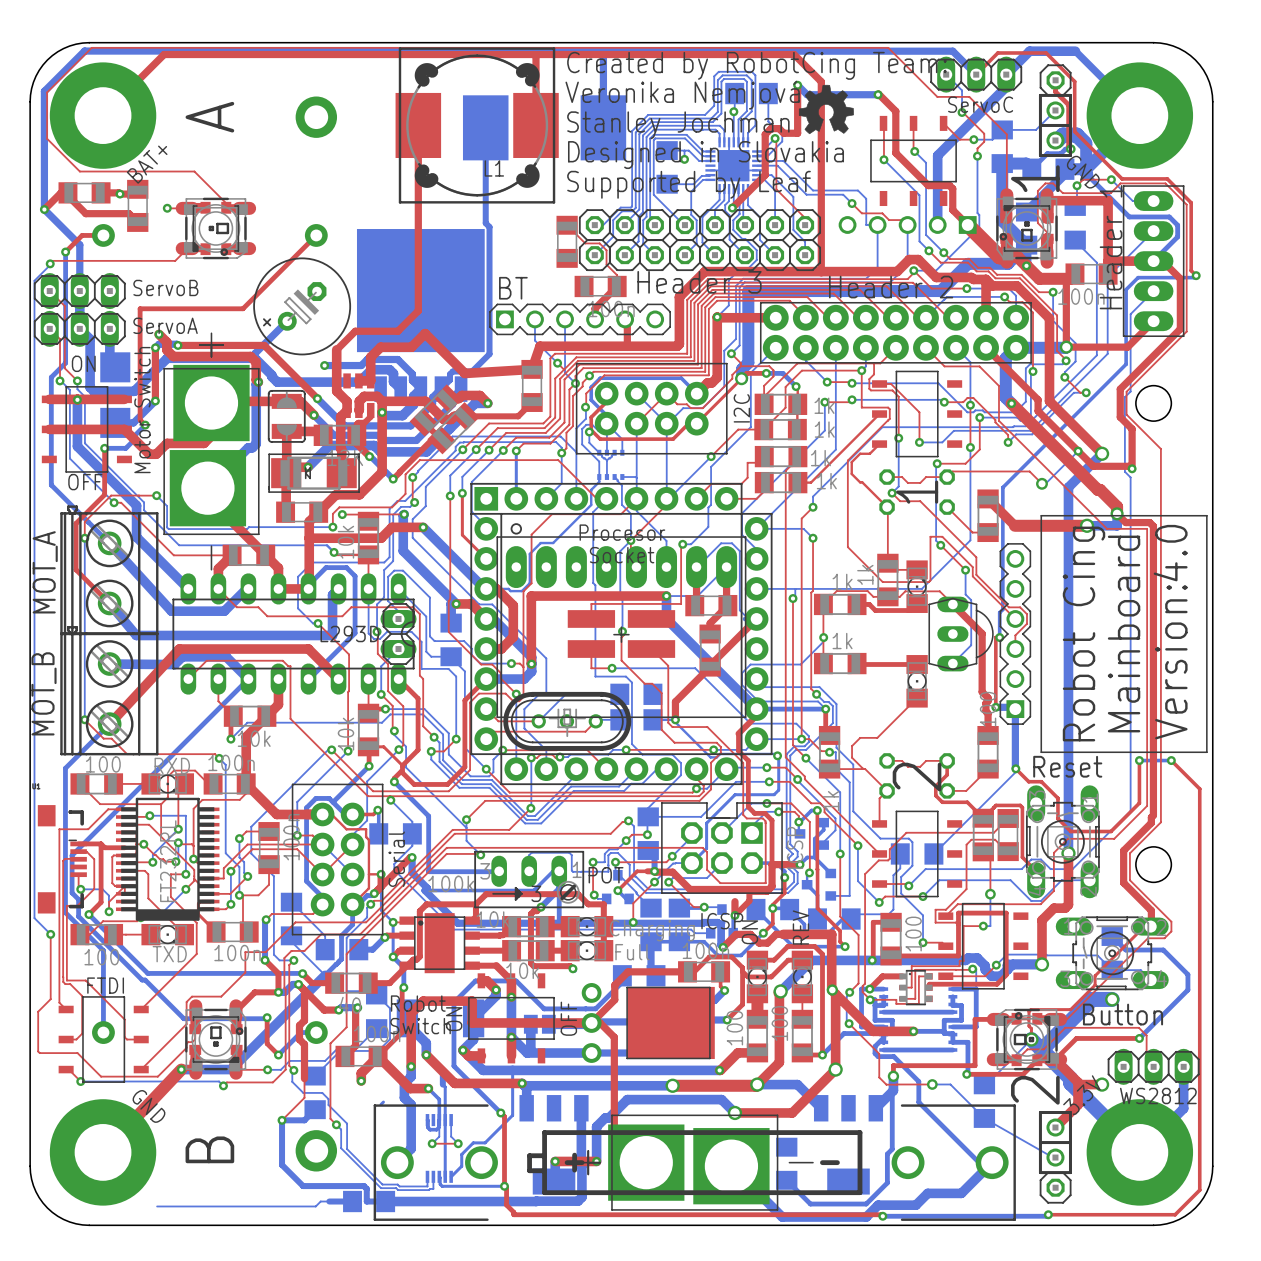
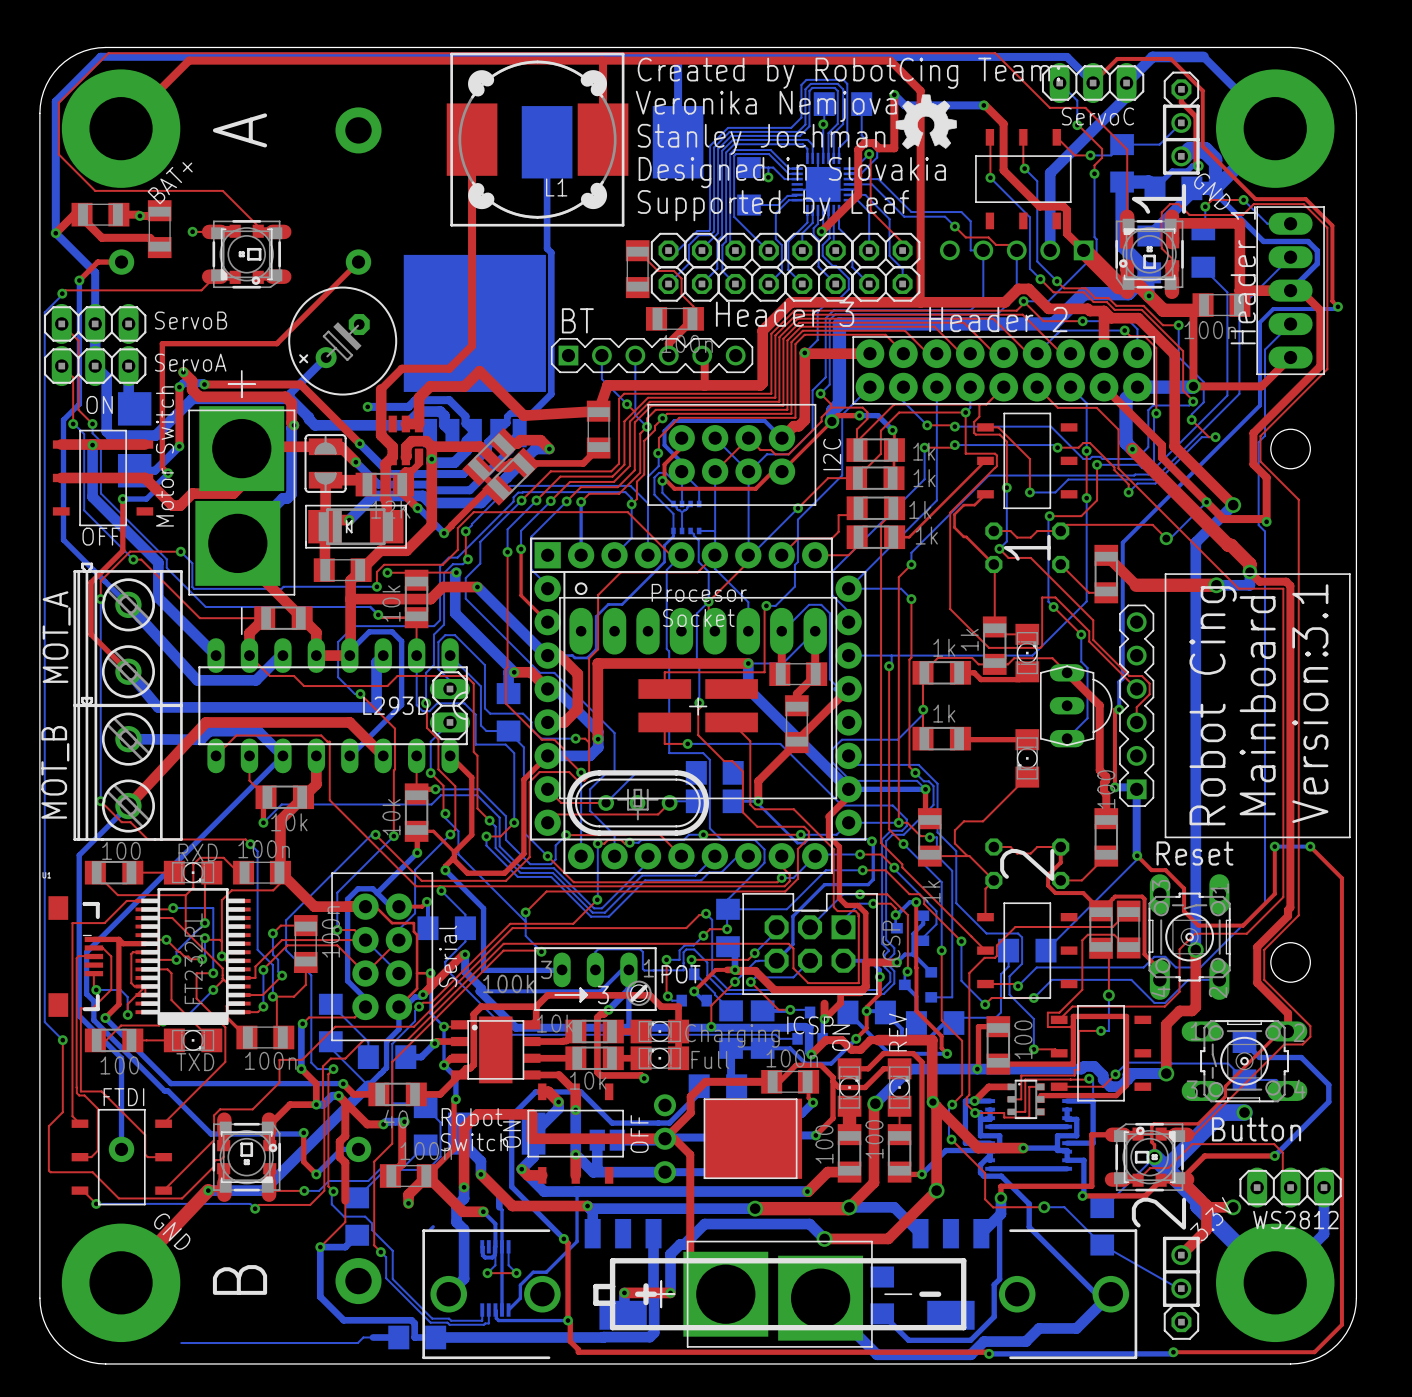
drawing shape: [1040, 514, 1208, 754] -> [1164, 573, 1351, 839]

